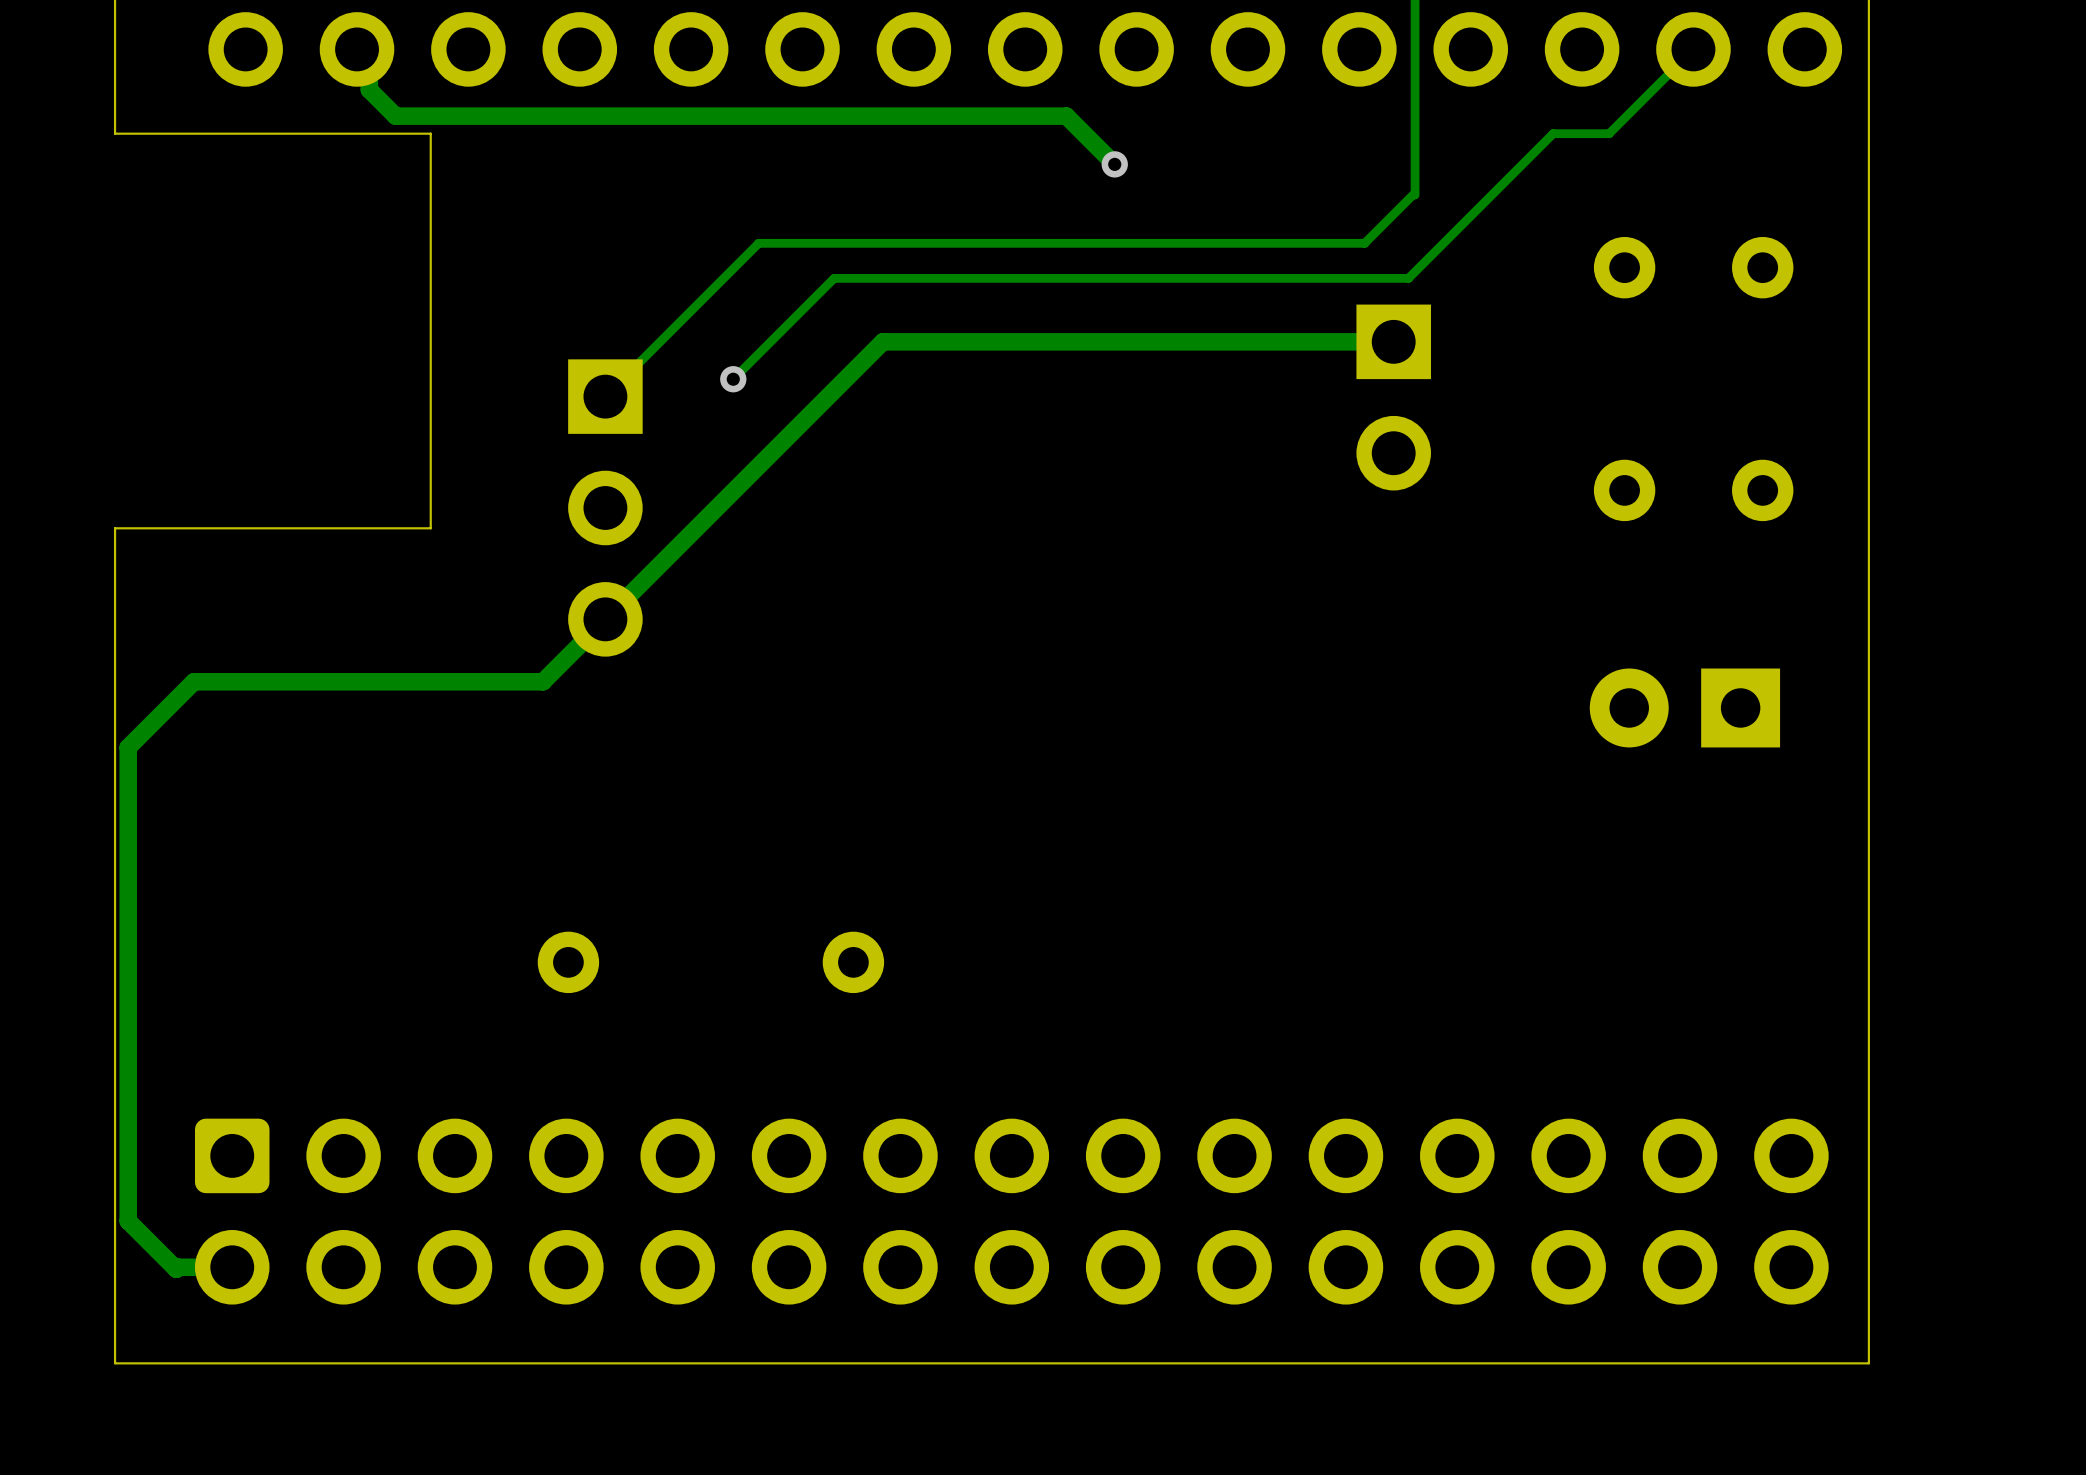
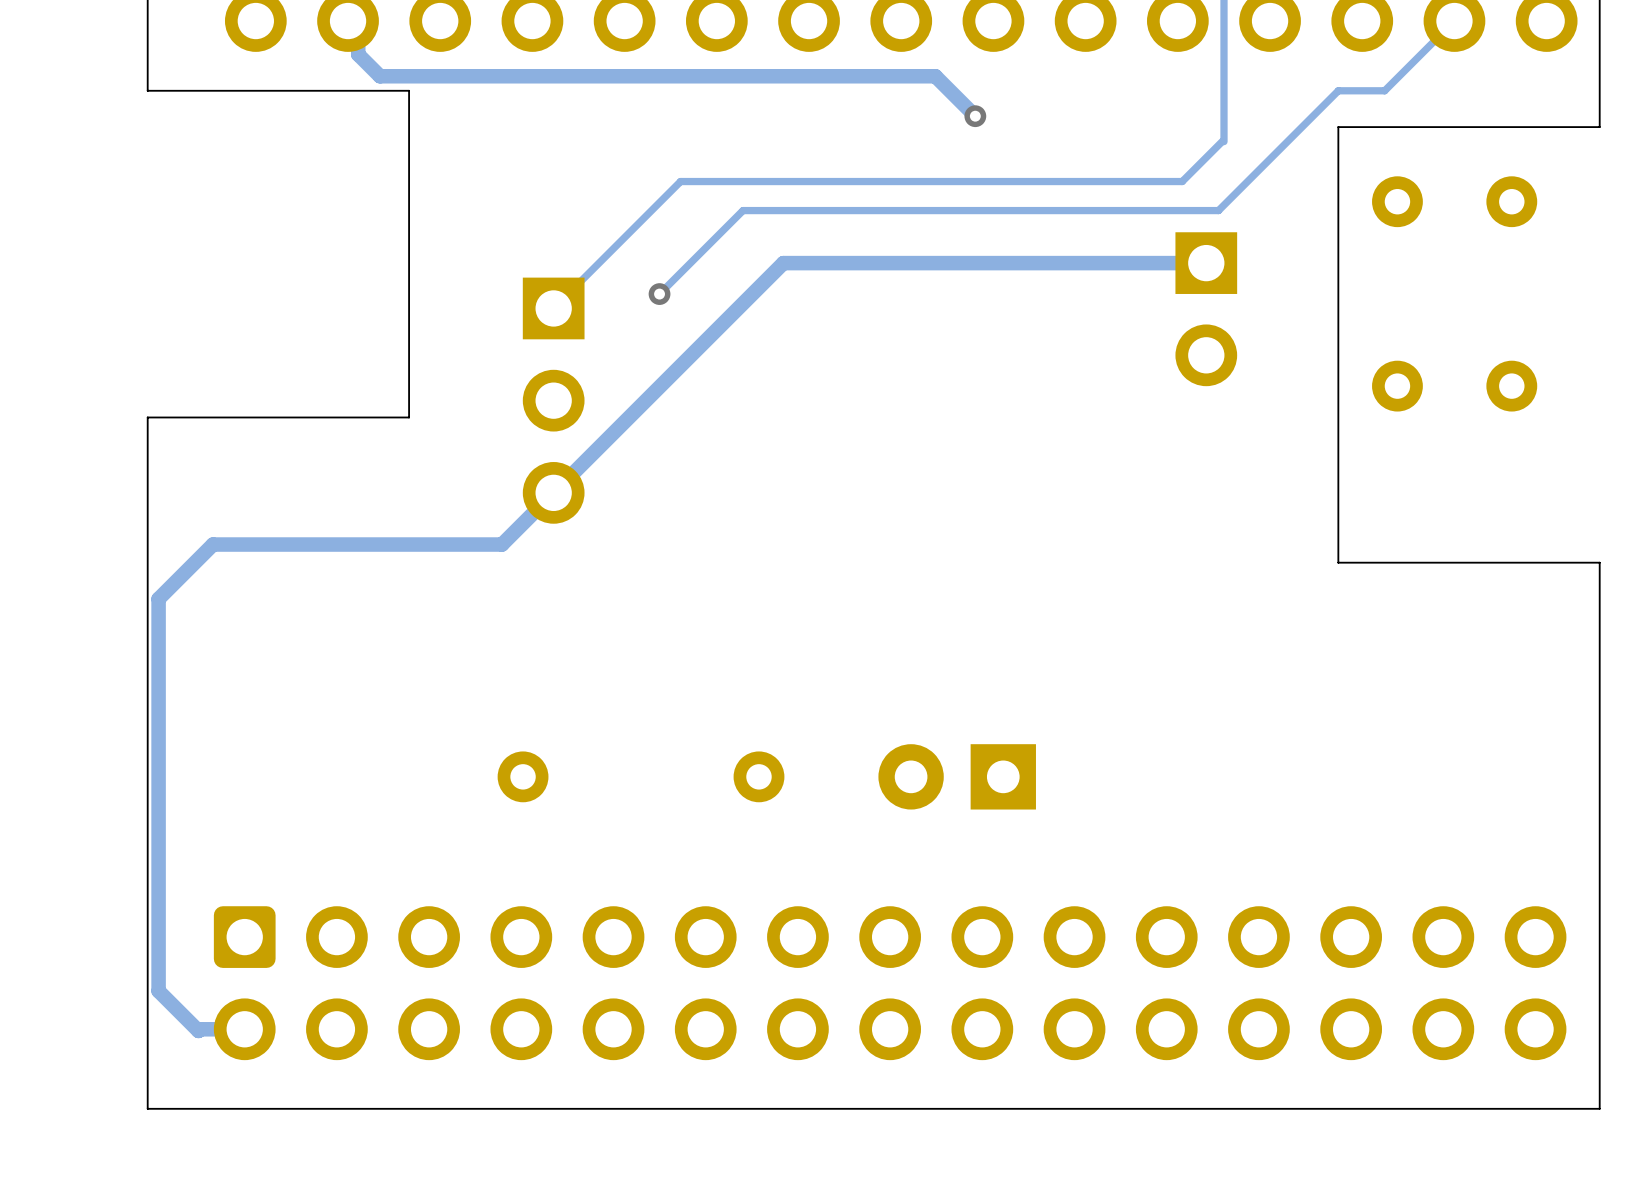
board edge: (1868, 177) (1868, 703) -> (1599, 127) (1338, 127) (1338, 562) (1599, 562)
part position: (1684, 707) -> (957, 776)

